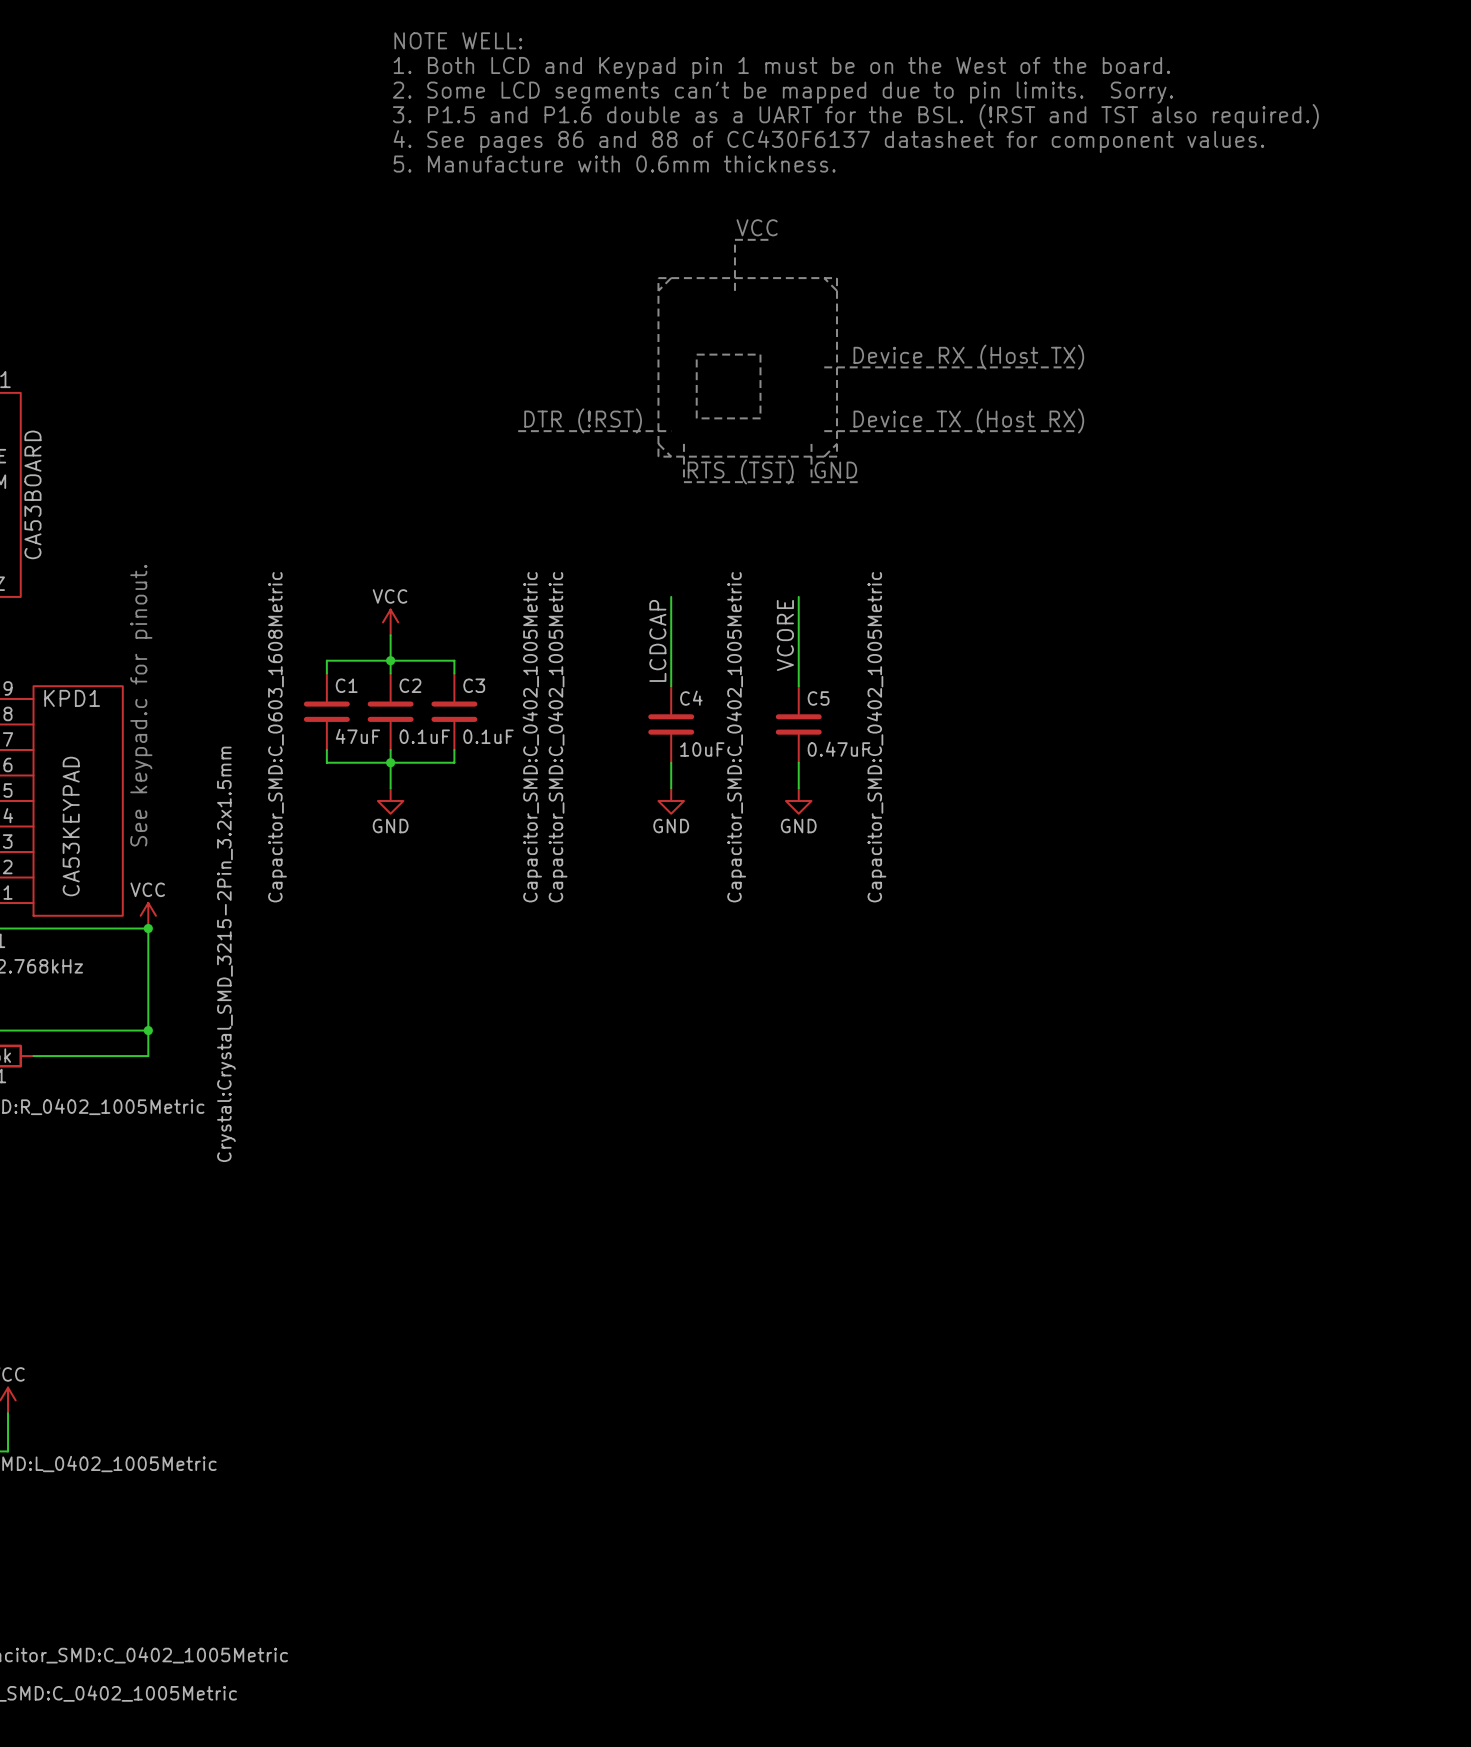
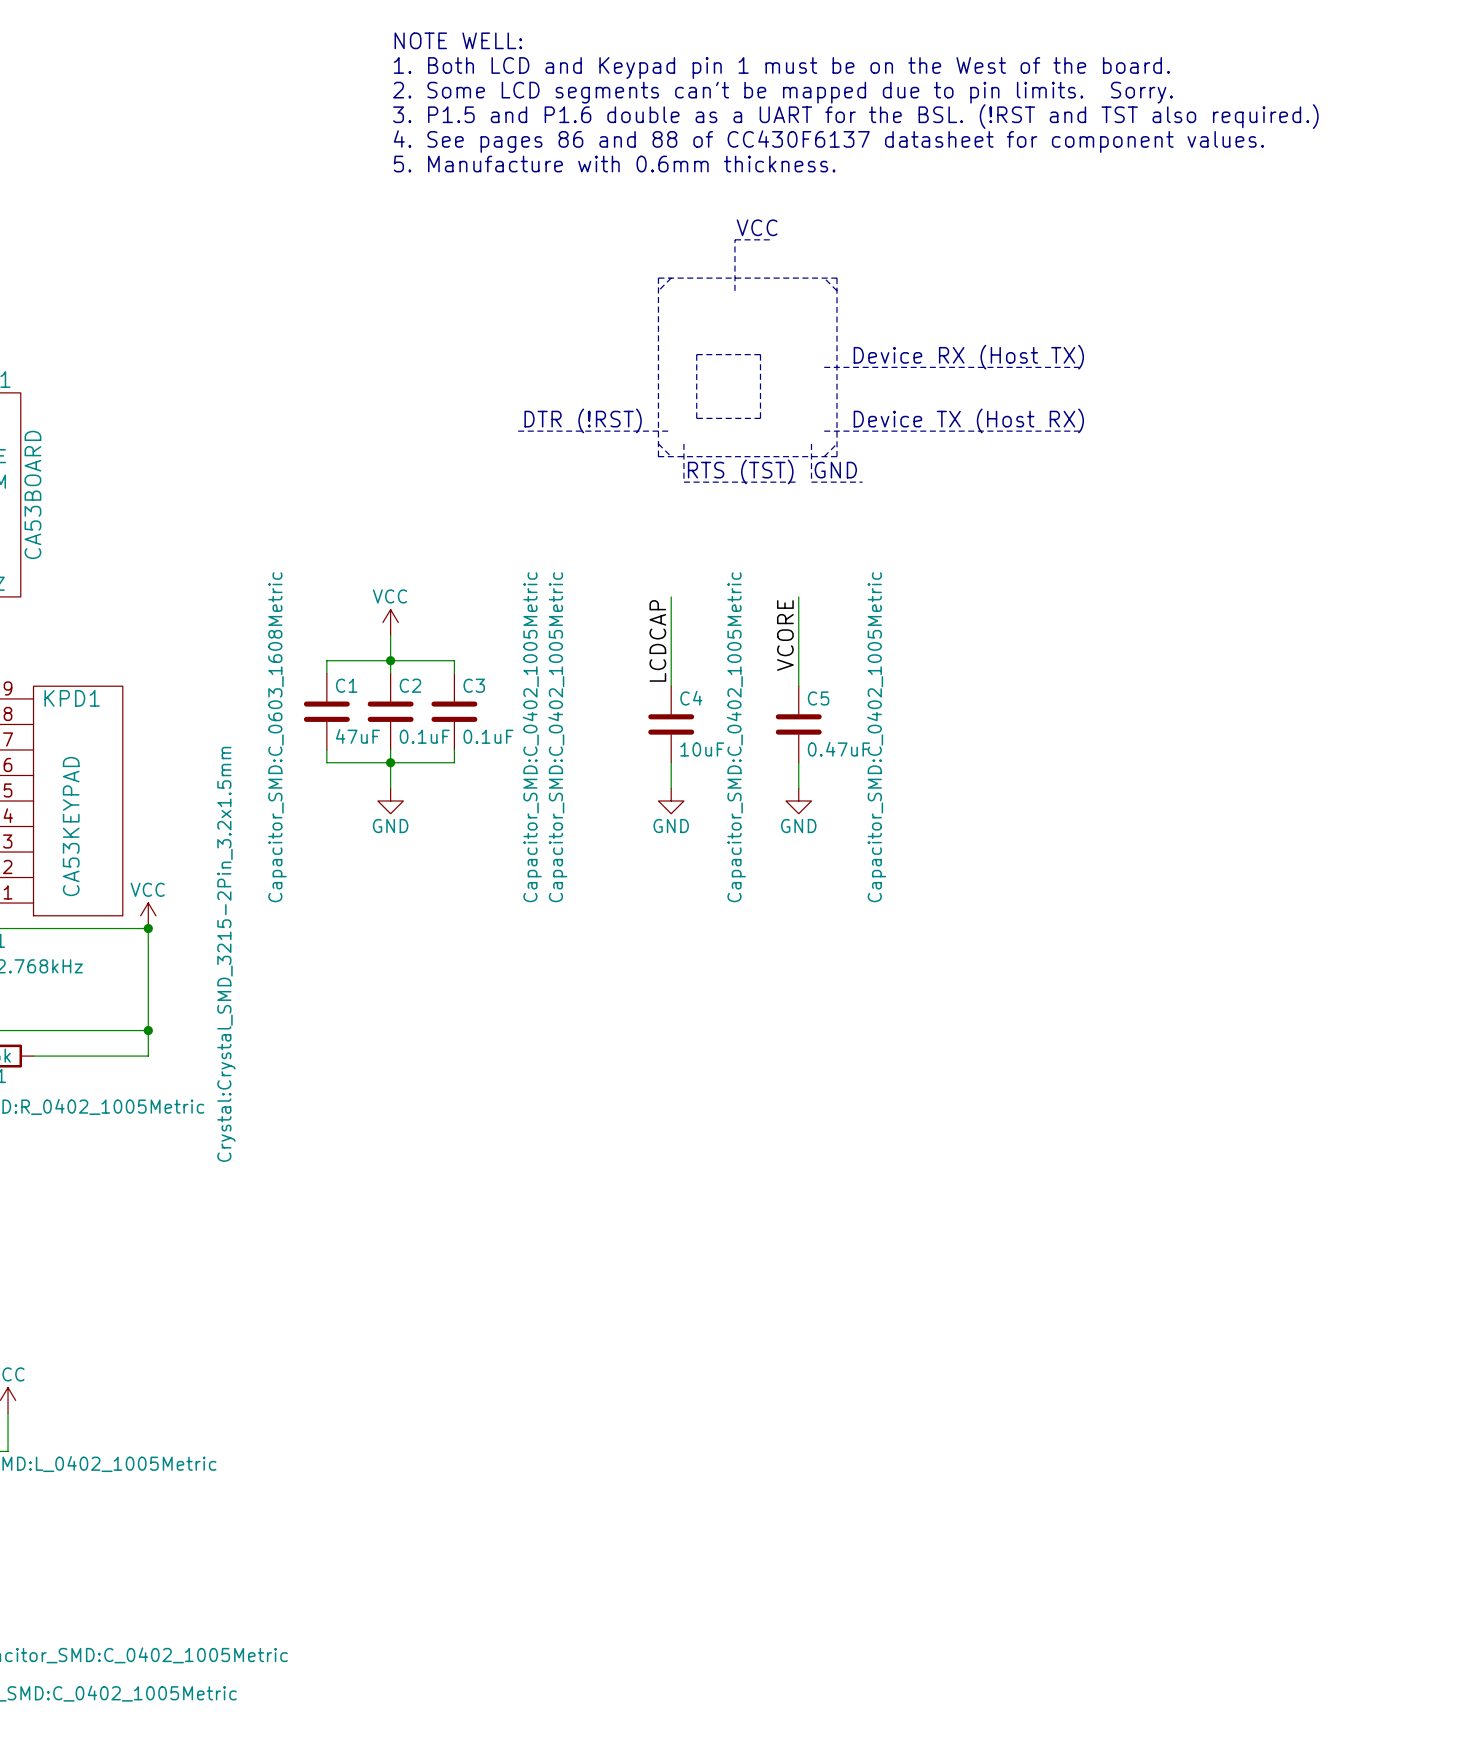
text: See keypad.c for pinout. (141, 705) -> none

